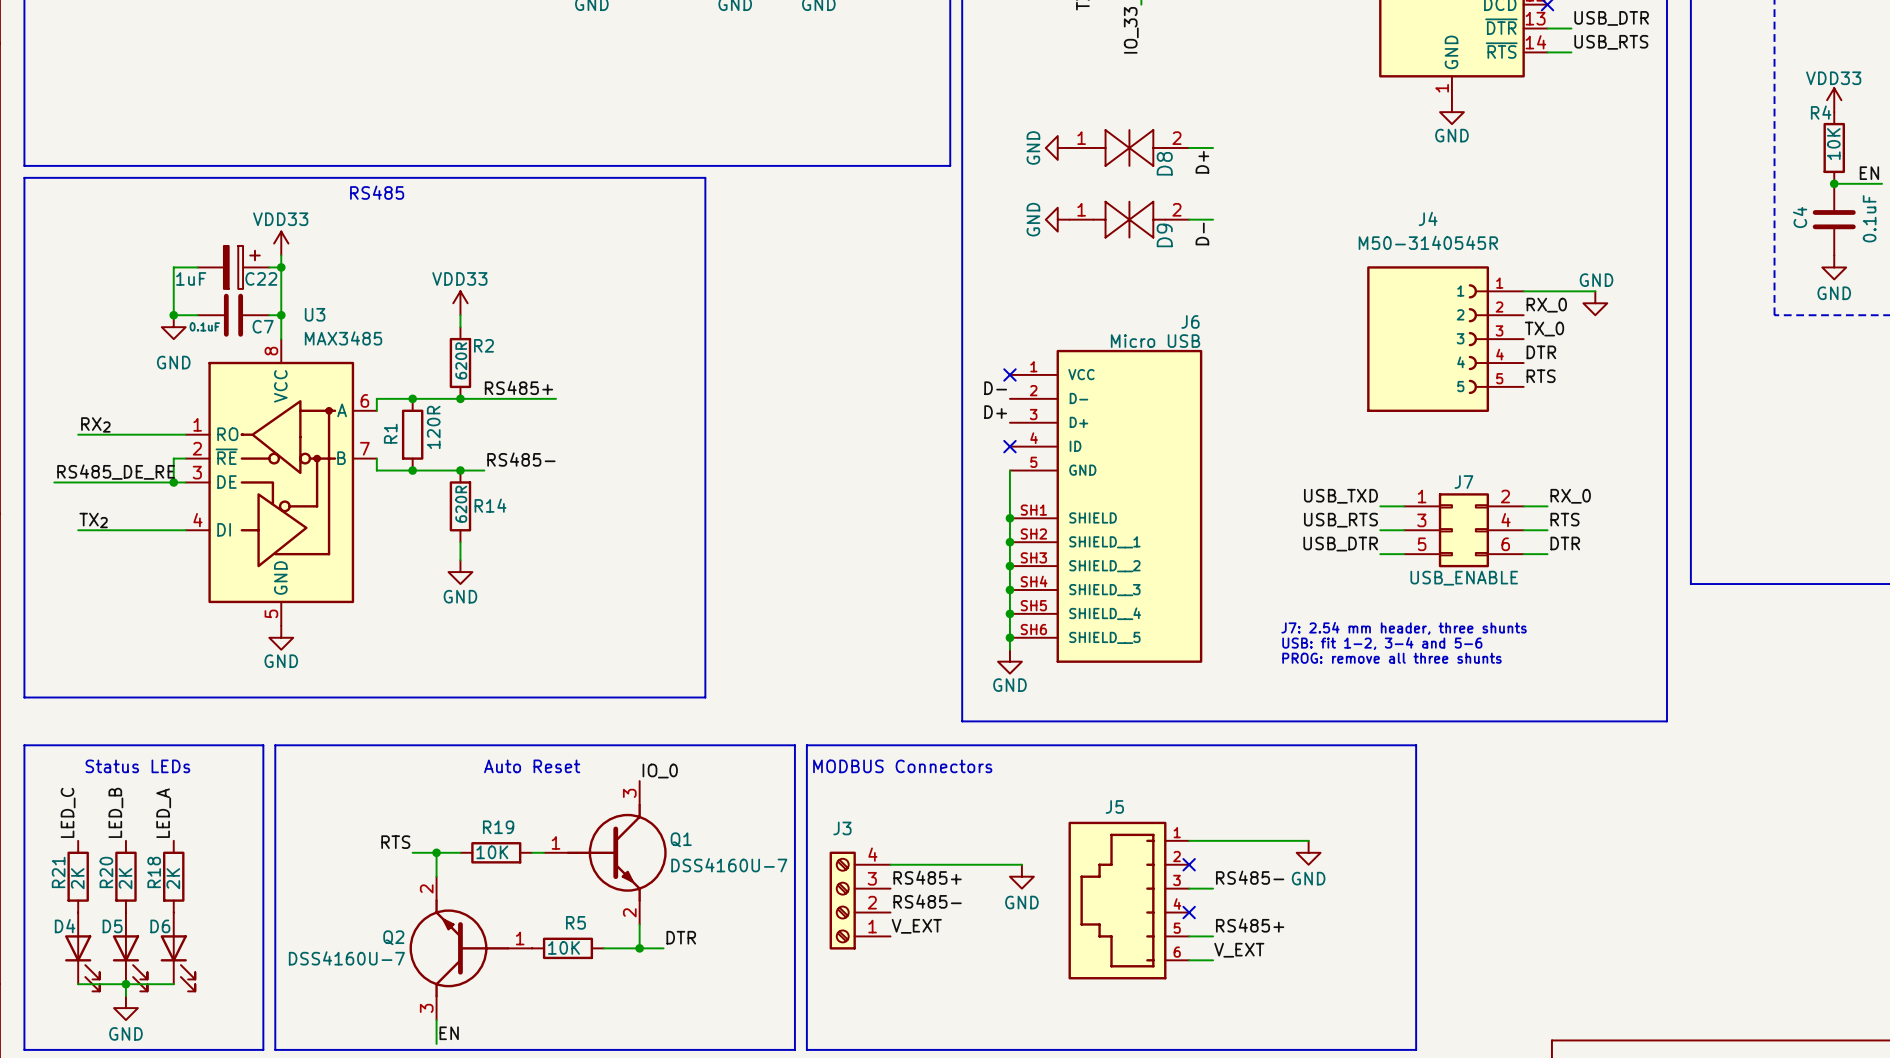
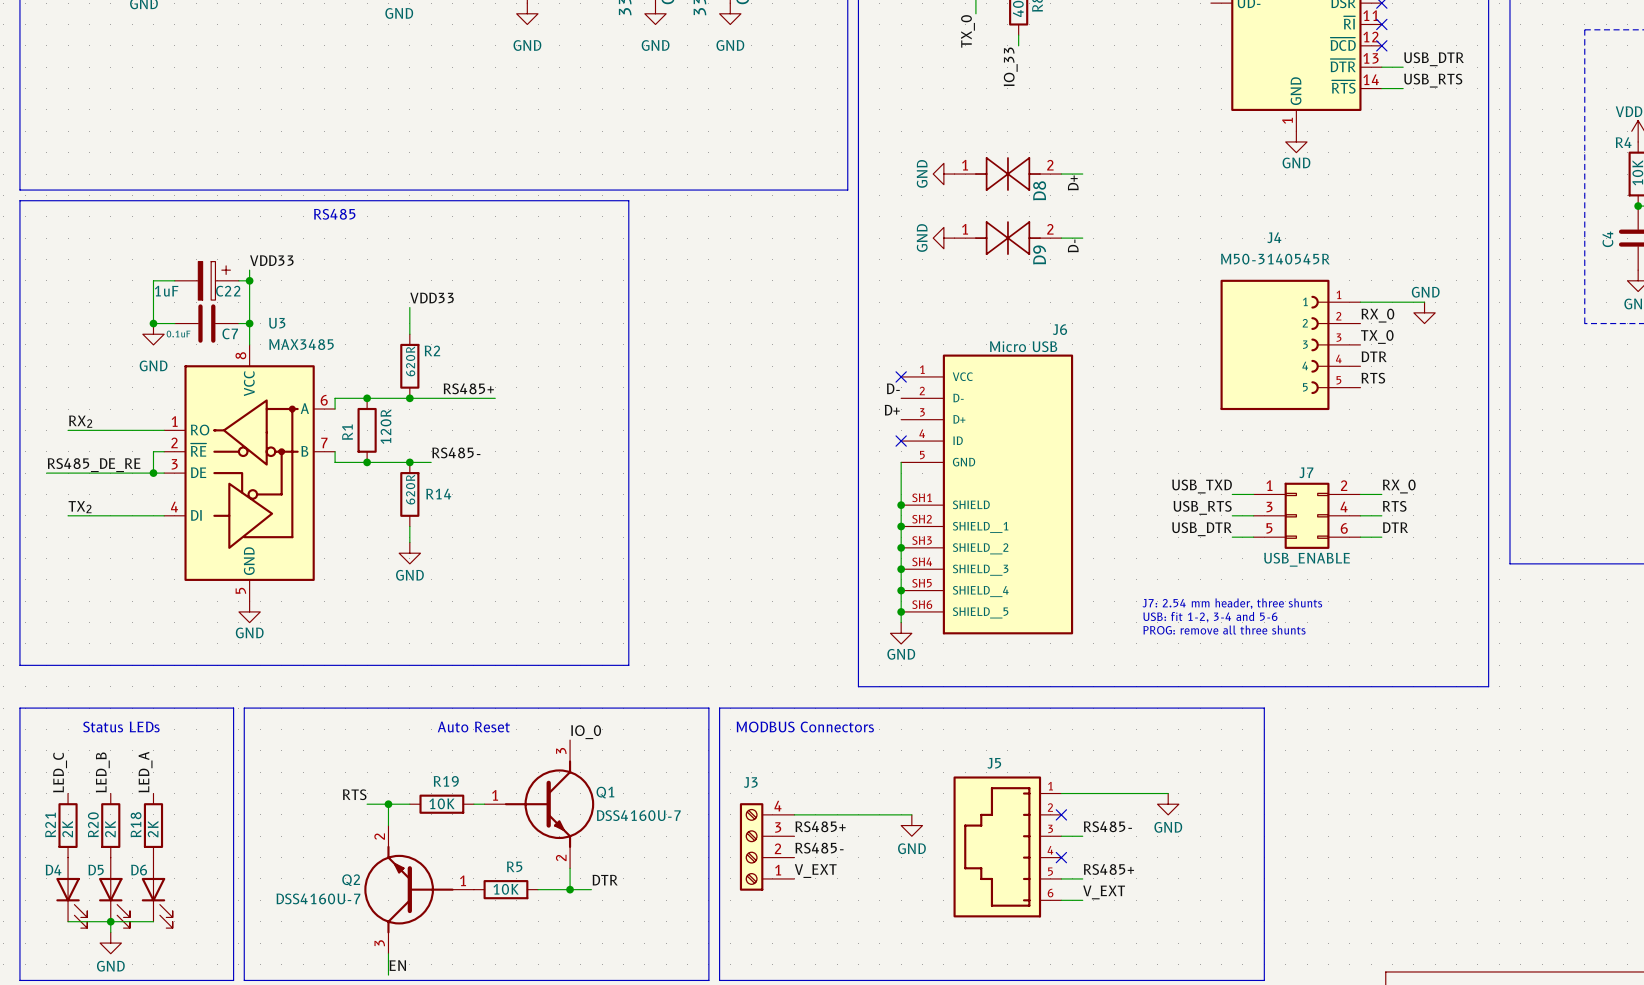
power symbol: VDD33 (281, 243) -> none
label: none -> VDD33 (271, 260)
label: none -> VDD33 (432, 298)
power symbol: VDD33 (460, 303) -> none

